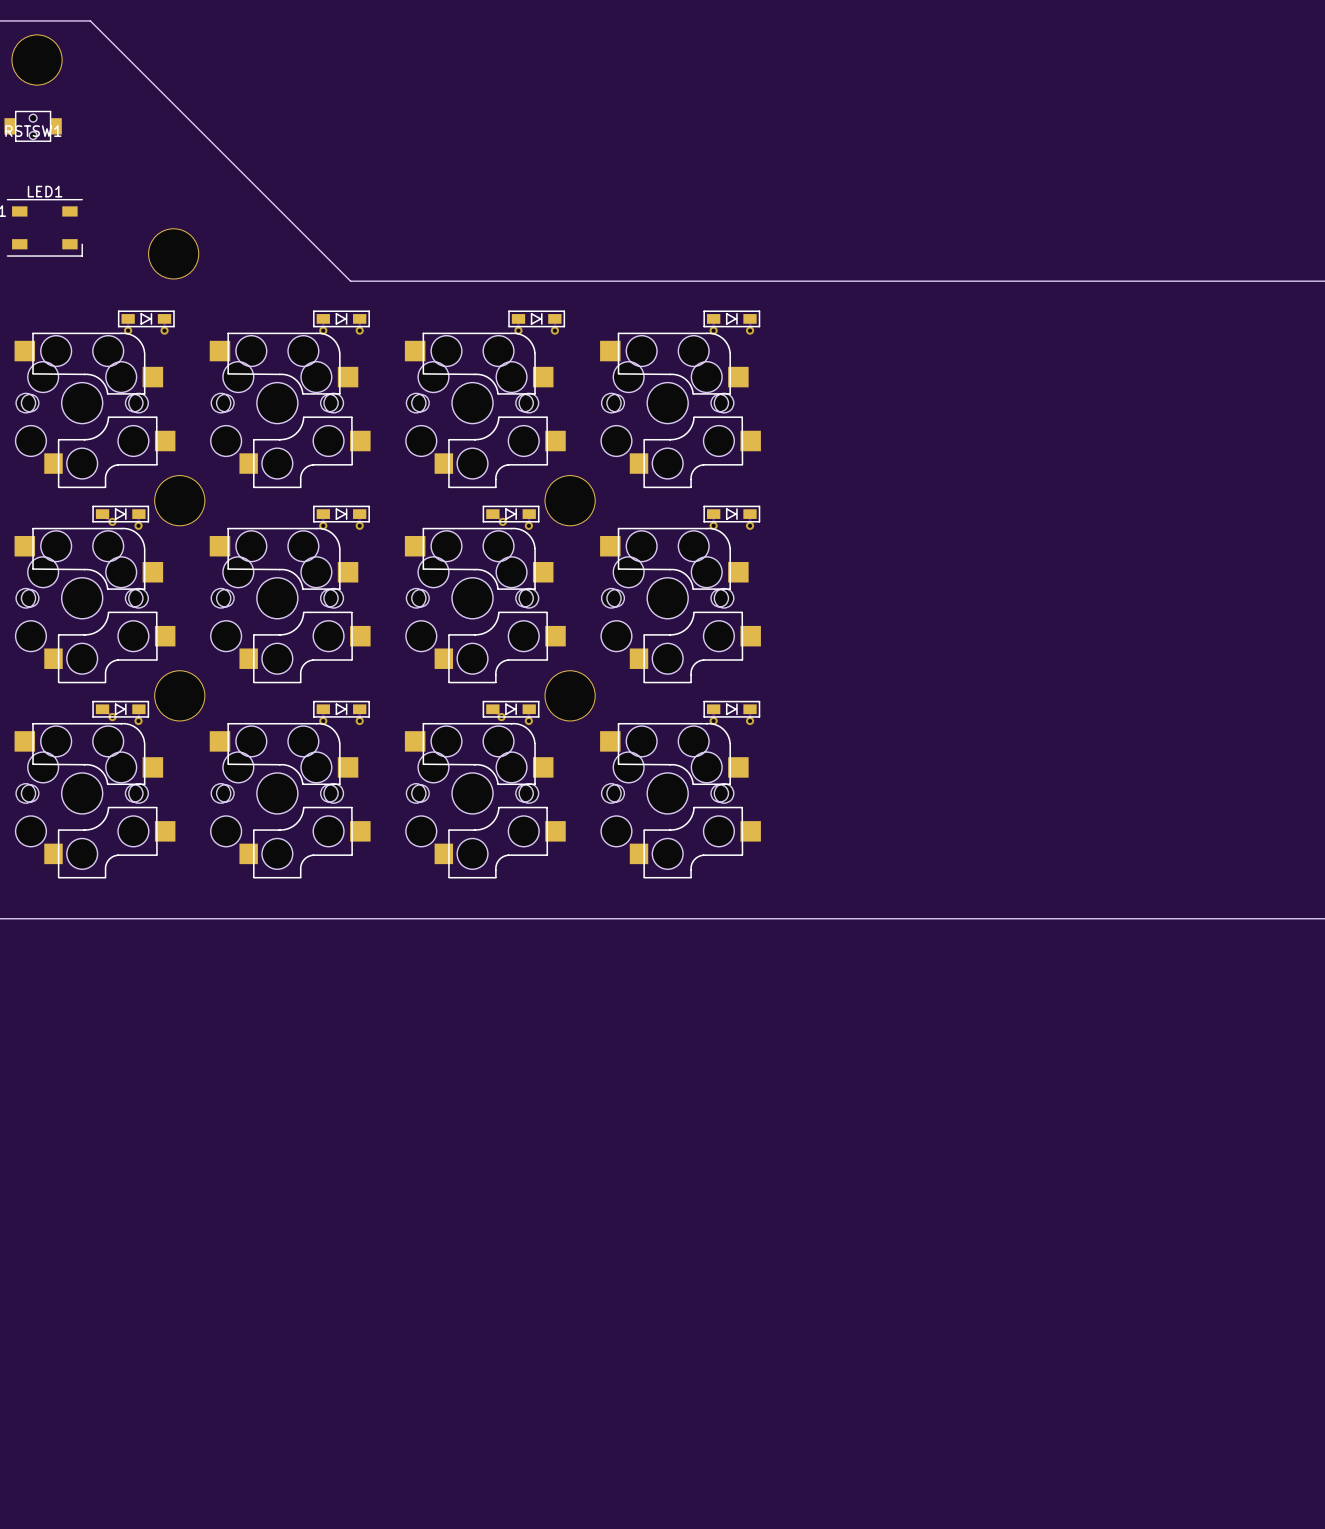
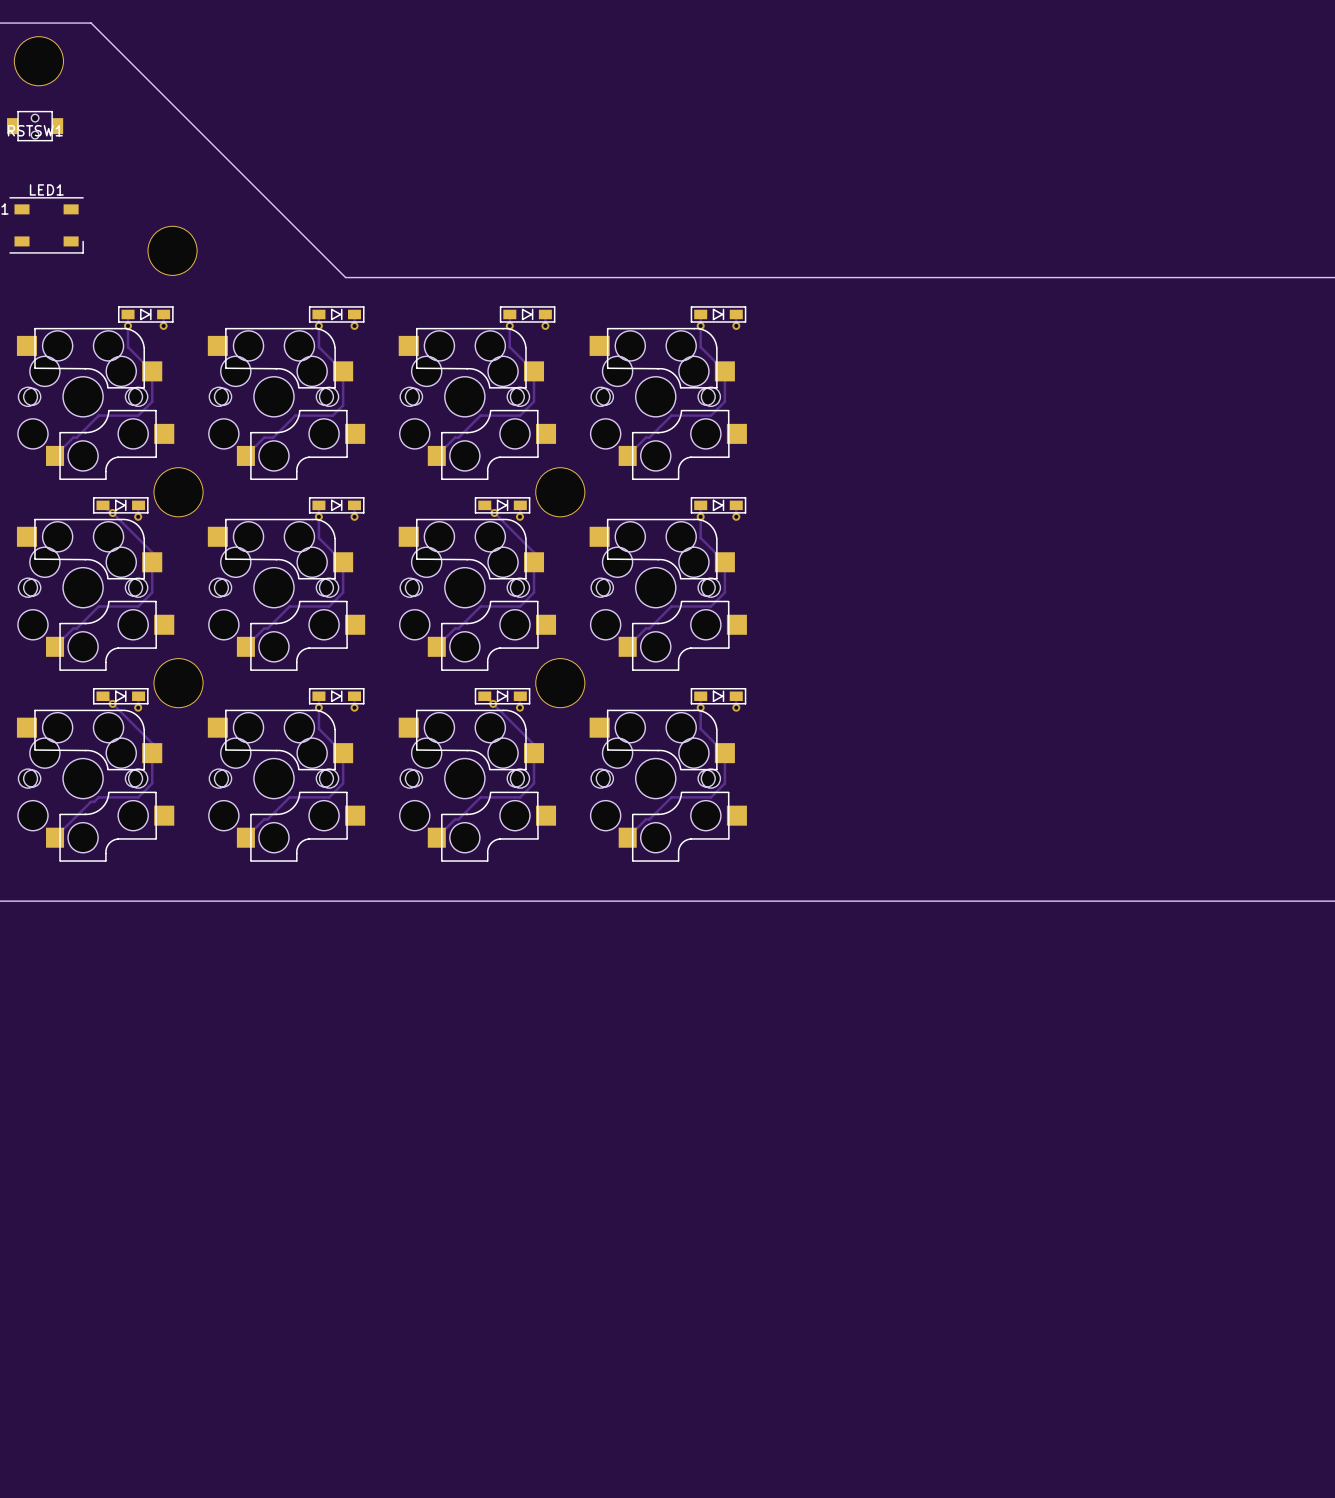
track: none -> (128, 325) (128, 347) (152, 371) (152, 401) (138, 415) (98, 415) (55, 455)
track: none -> (318, 325) (318, 347) (343, 371) (343, 405) (332, 415) (295, 415) (273, 437) (264, 437) (245, 455)
track: none -> (509, 325) (509, 347) (534, 371) (534, 401) (520, 415) (480, 415) (436, 455)
track: none -> (700, 325) (700, 347) (724, 371) (724, 401) (710, 415) (671, 415) (627, 455)
track: none -> (112, 513) (152, 552) (152, 592) (138, 606) (98, 606) (55, 646)
track: none -> (494, 513) (534, 552) (534, 592) (520, 606) (480, 606) (436, 646)
track: none -> (318, 516) (318, 538) (343, 562) (343, 592) (329, 606) (289, 606) (245, 646)
track: none -> (700, 516) (700, 538) (724, 562) (724, 592) (710, 606) (671, 606) (627, 646)
track: none -> (112, 703) (152, 743) (152, 783) (138, 797) (98, 797) (94, 801) (90, 801) (55, 837)
track: none -> (493, 703) (534, 744) (534, 783) (520, 797) (480, 797) (436, 837)
track: none -> (318, 707) (318, 728) (343, 753) (343, 783) (329, 797) (289, 797) (245, 837)
track: none -> (700, 707) (700, 728) (724, 753) (724, 783) (710, 797) (671, 797) (627, 837)

